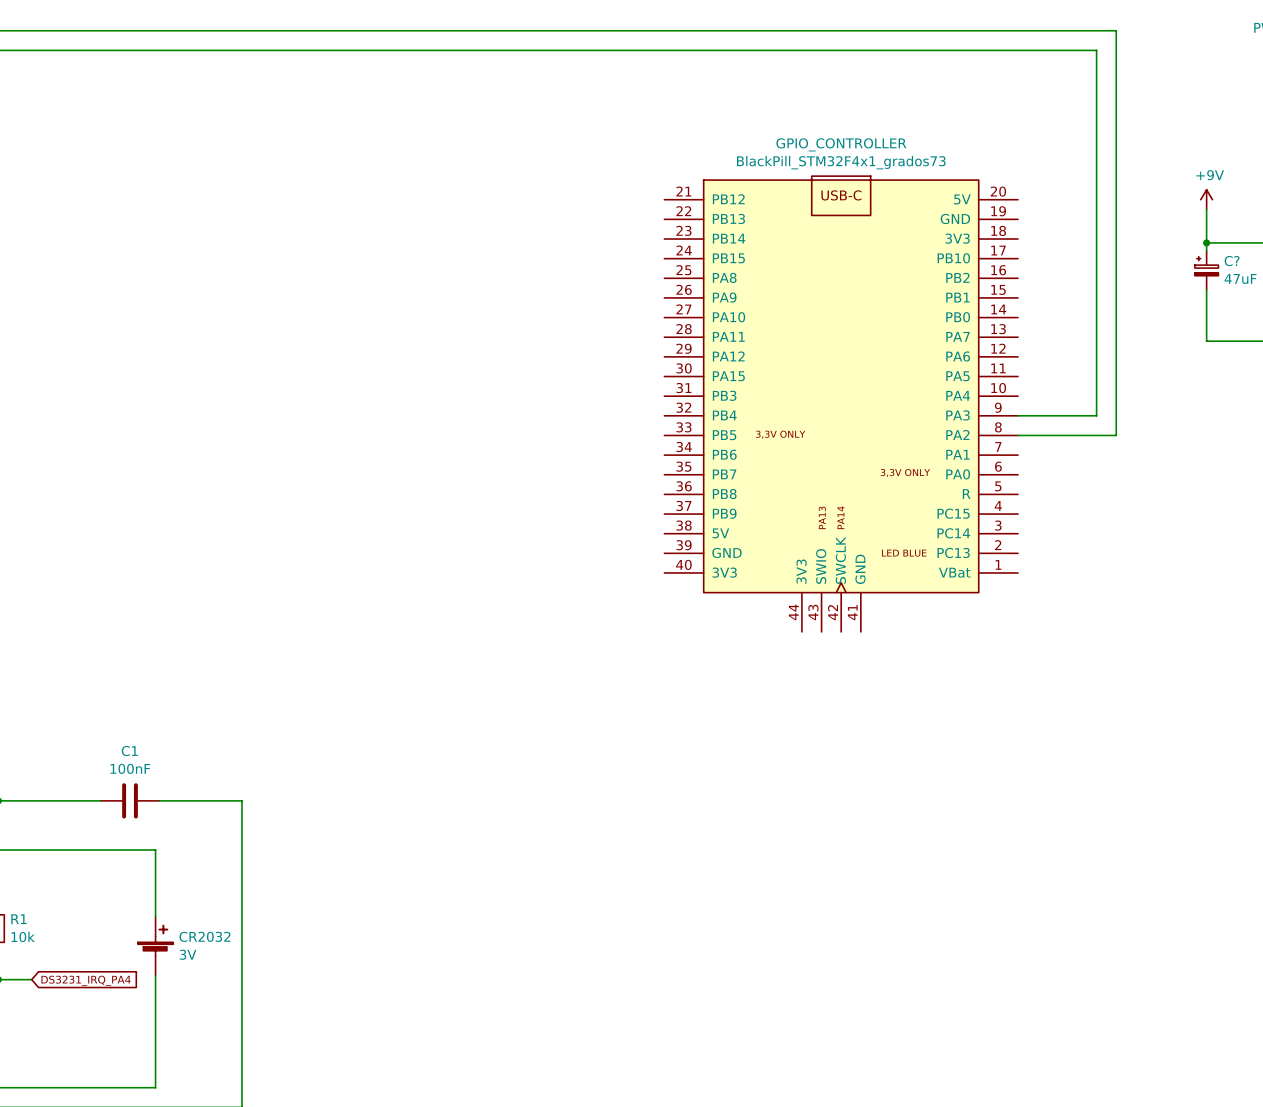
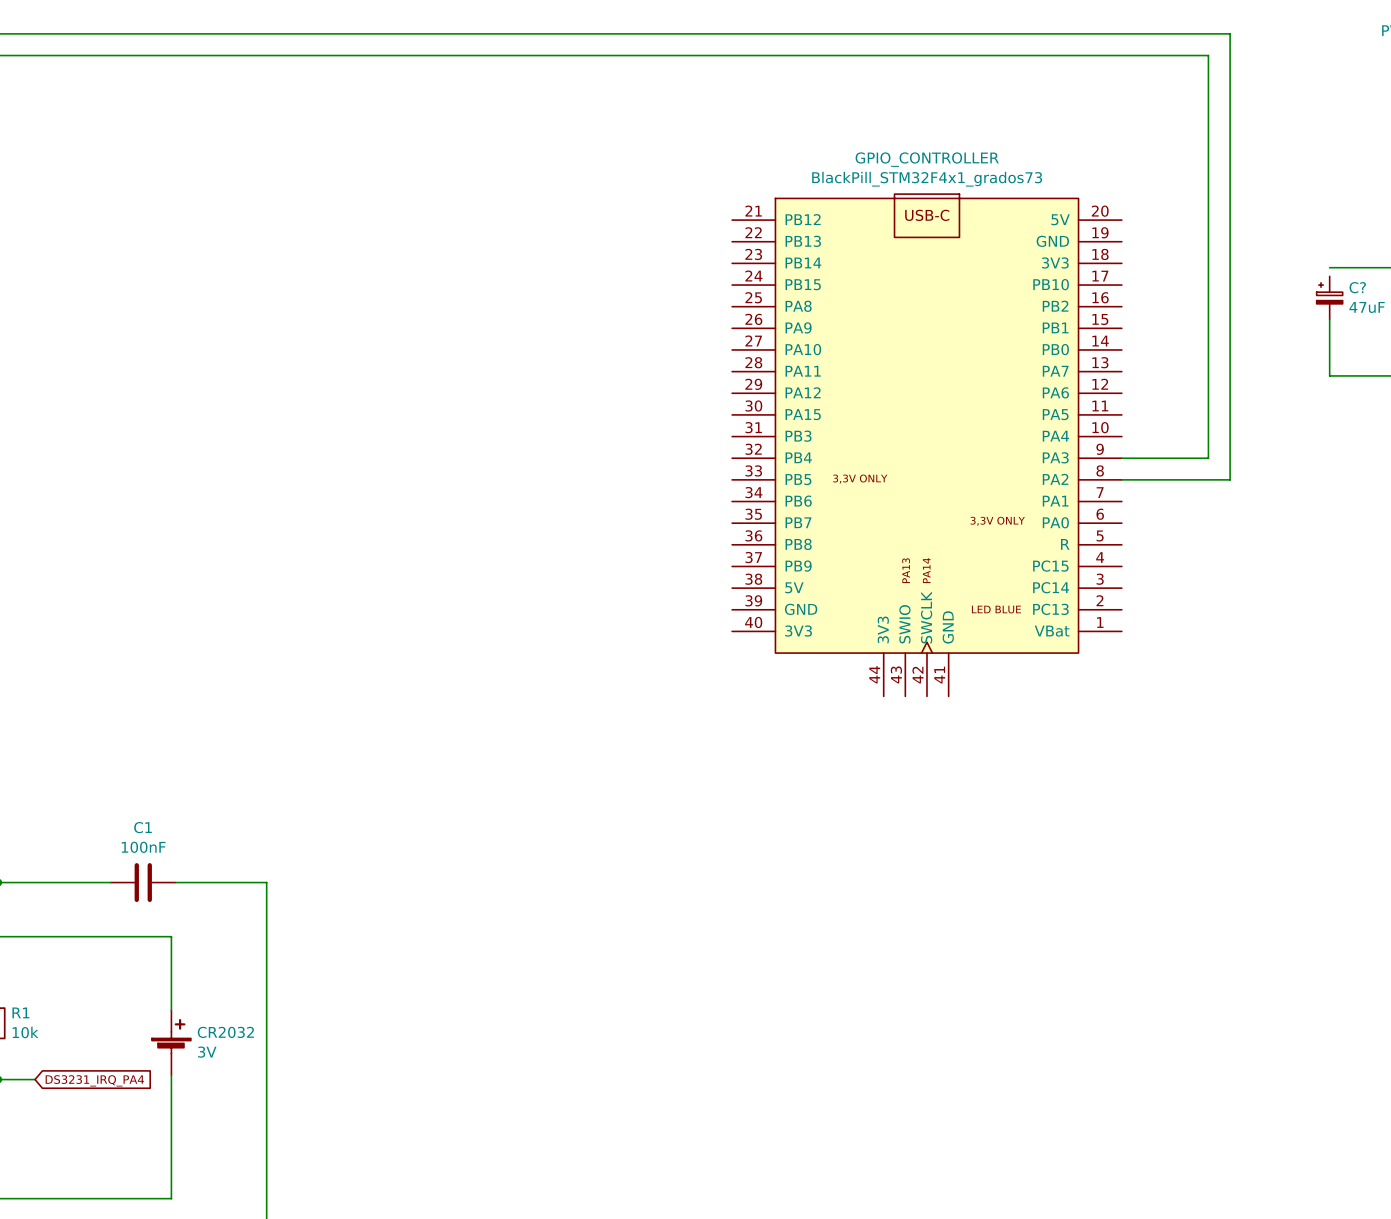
power symbol: +9V (1206, 199) -> none
wire: (1206, 209) (1206, 250) -> none
junction: (1206, 242) -> none

